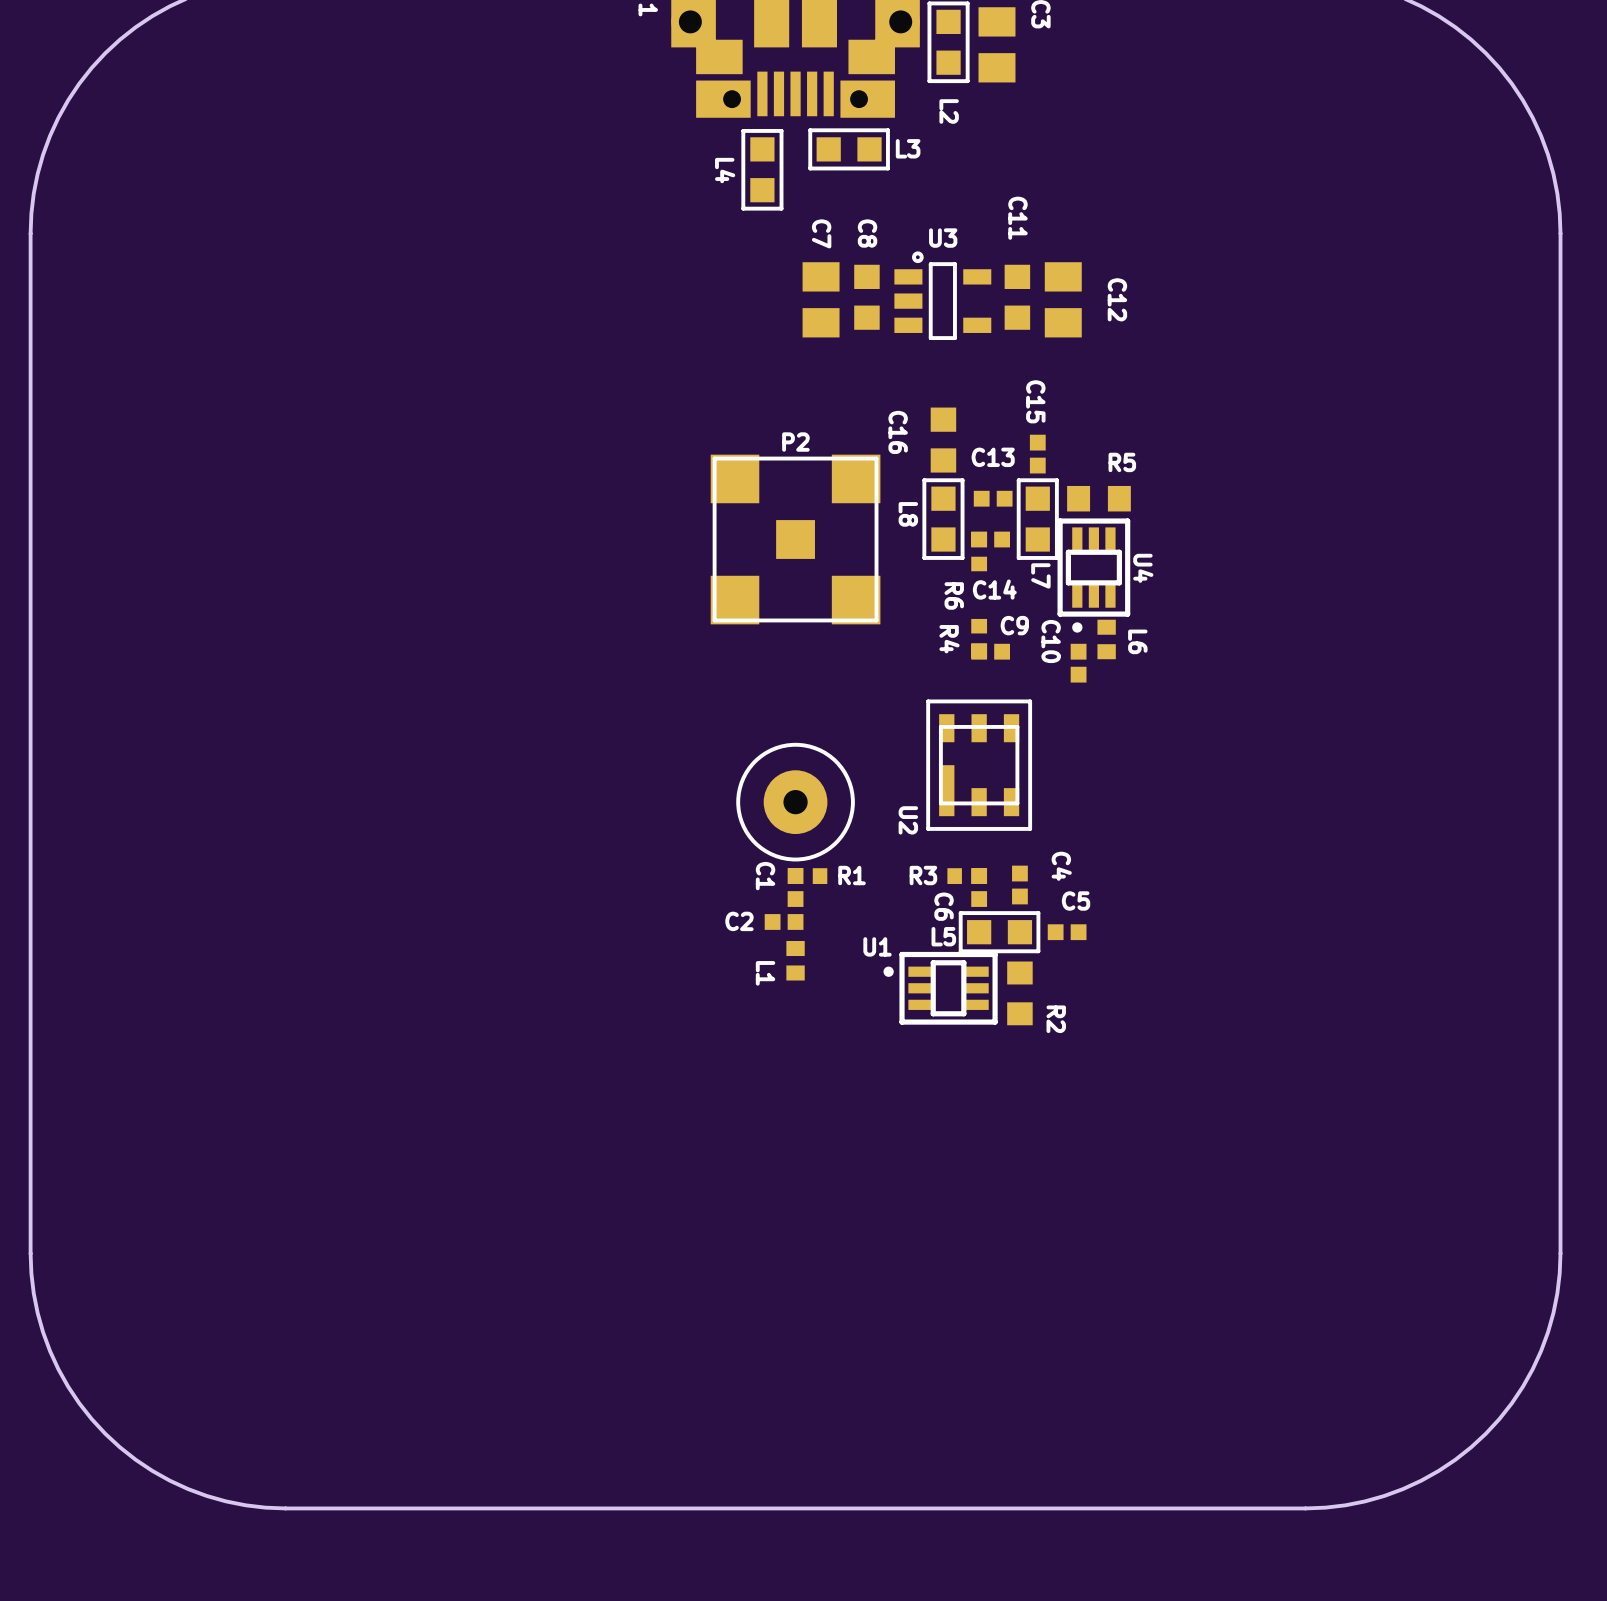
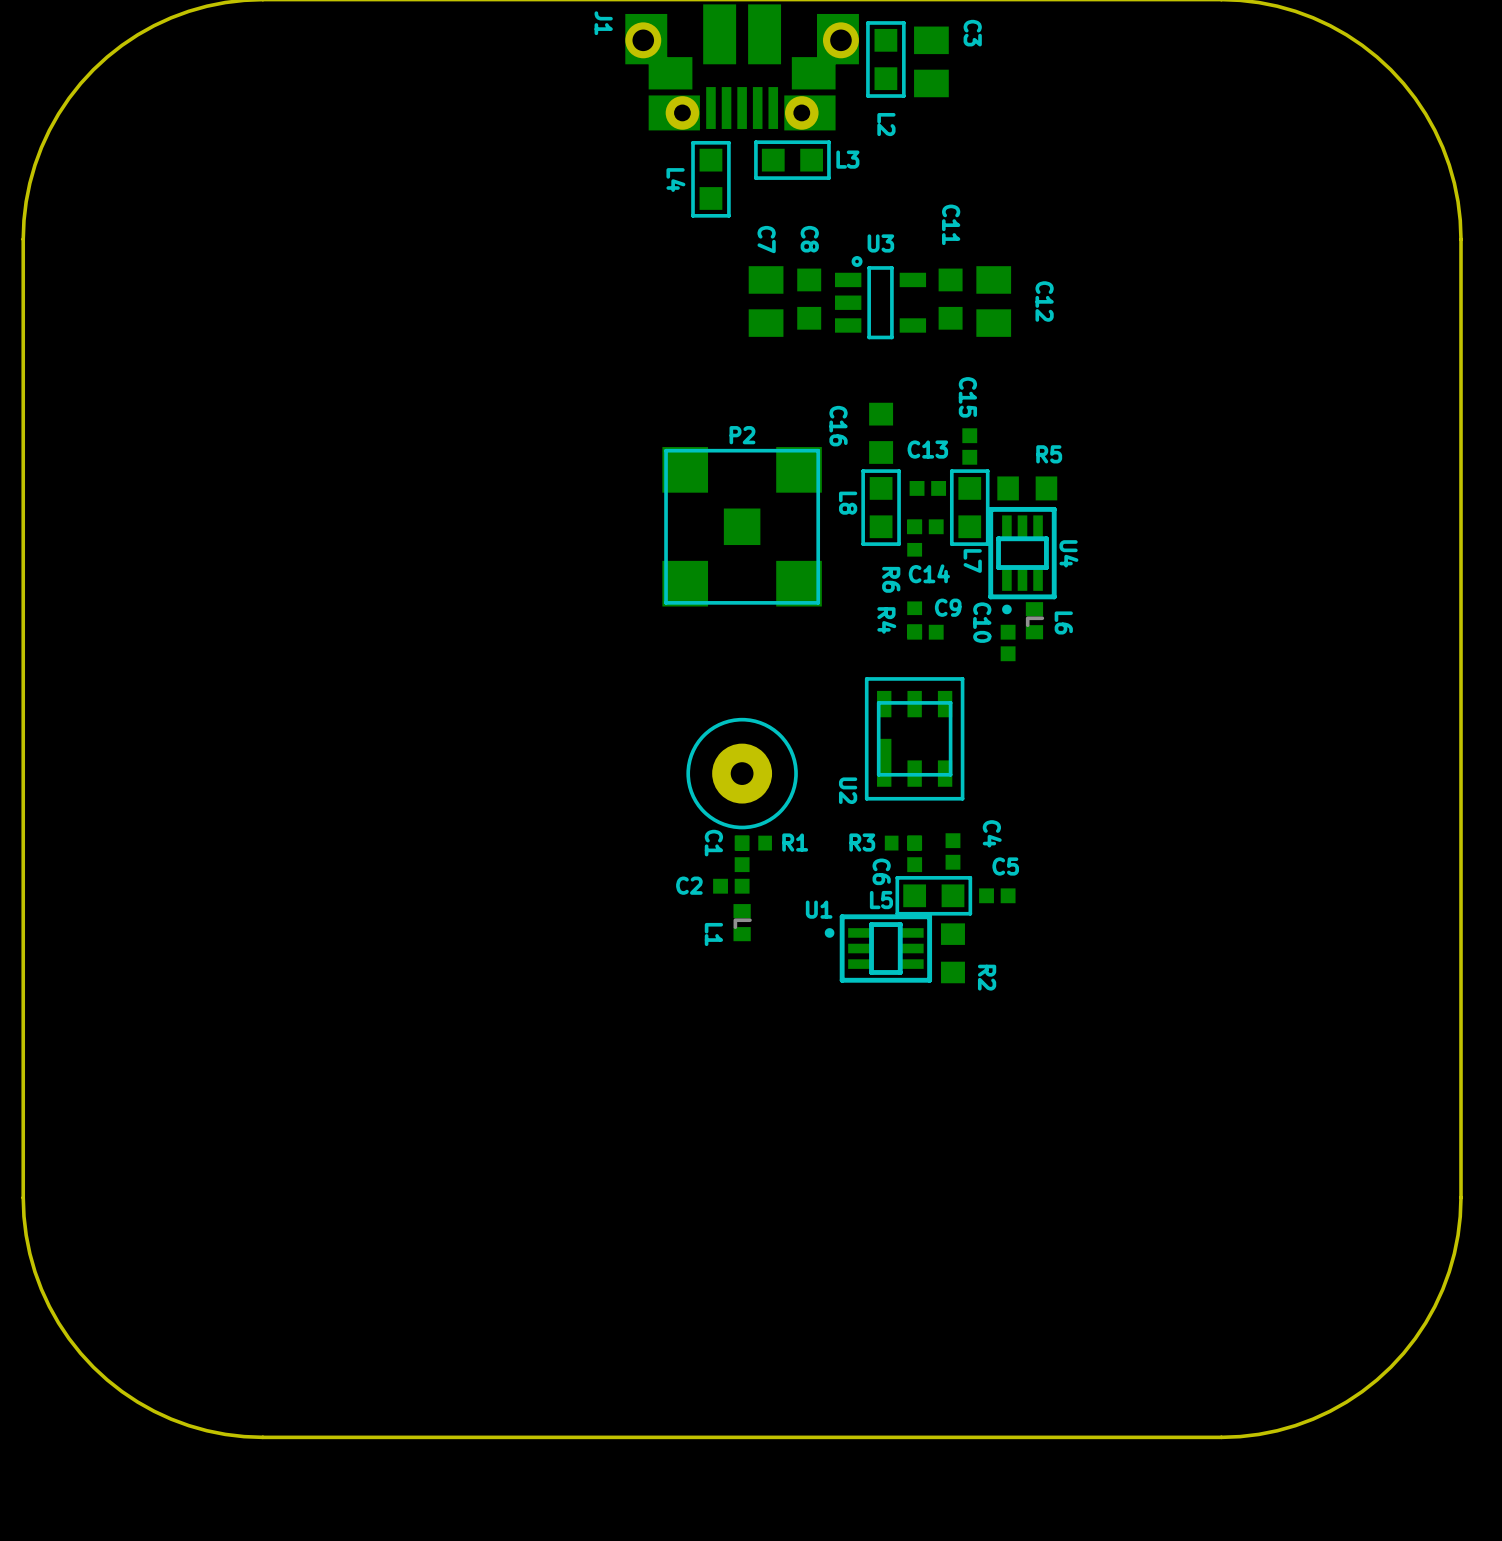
L6 value: none -> L (1035, 621)
L1 value: none -> L (742, 923)

